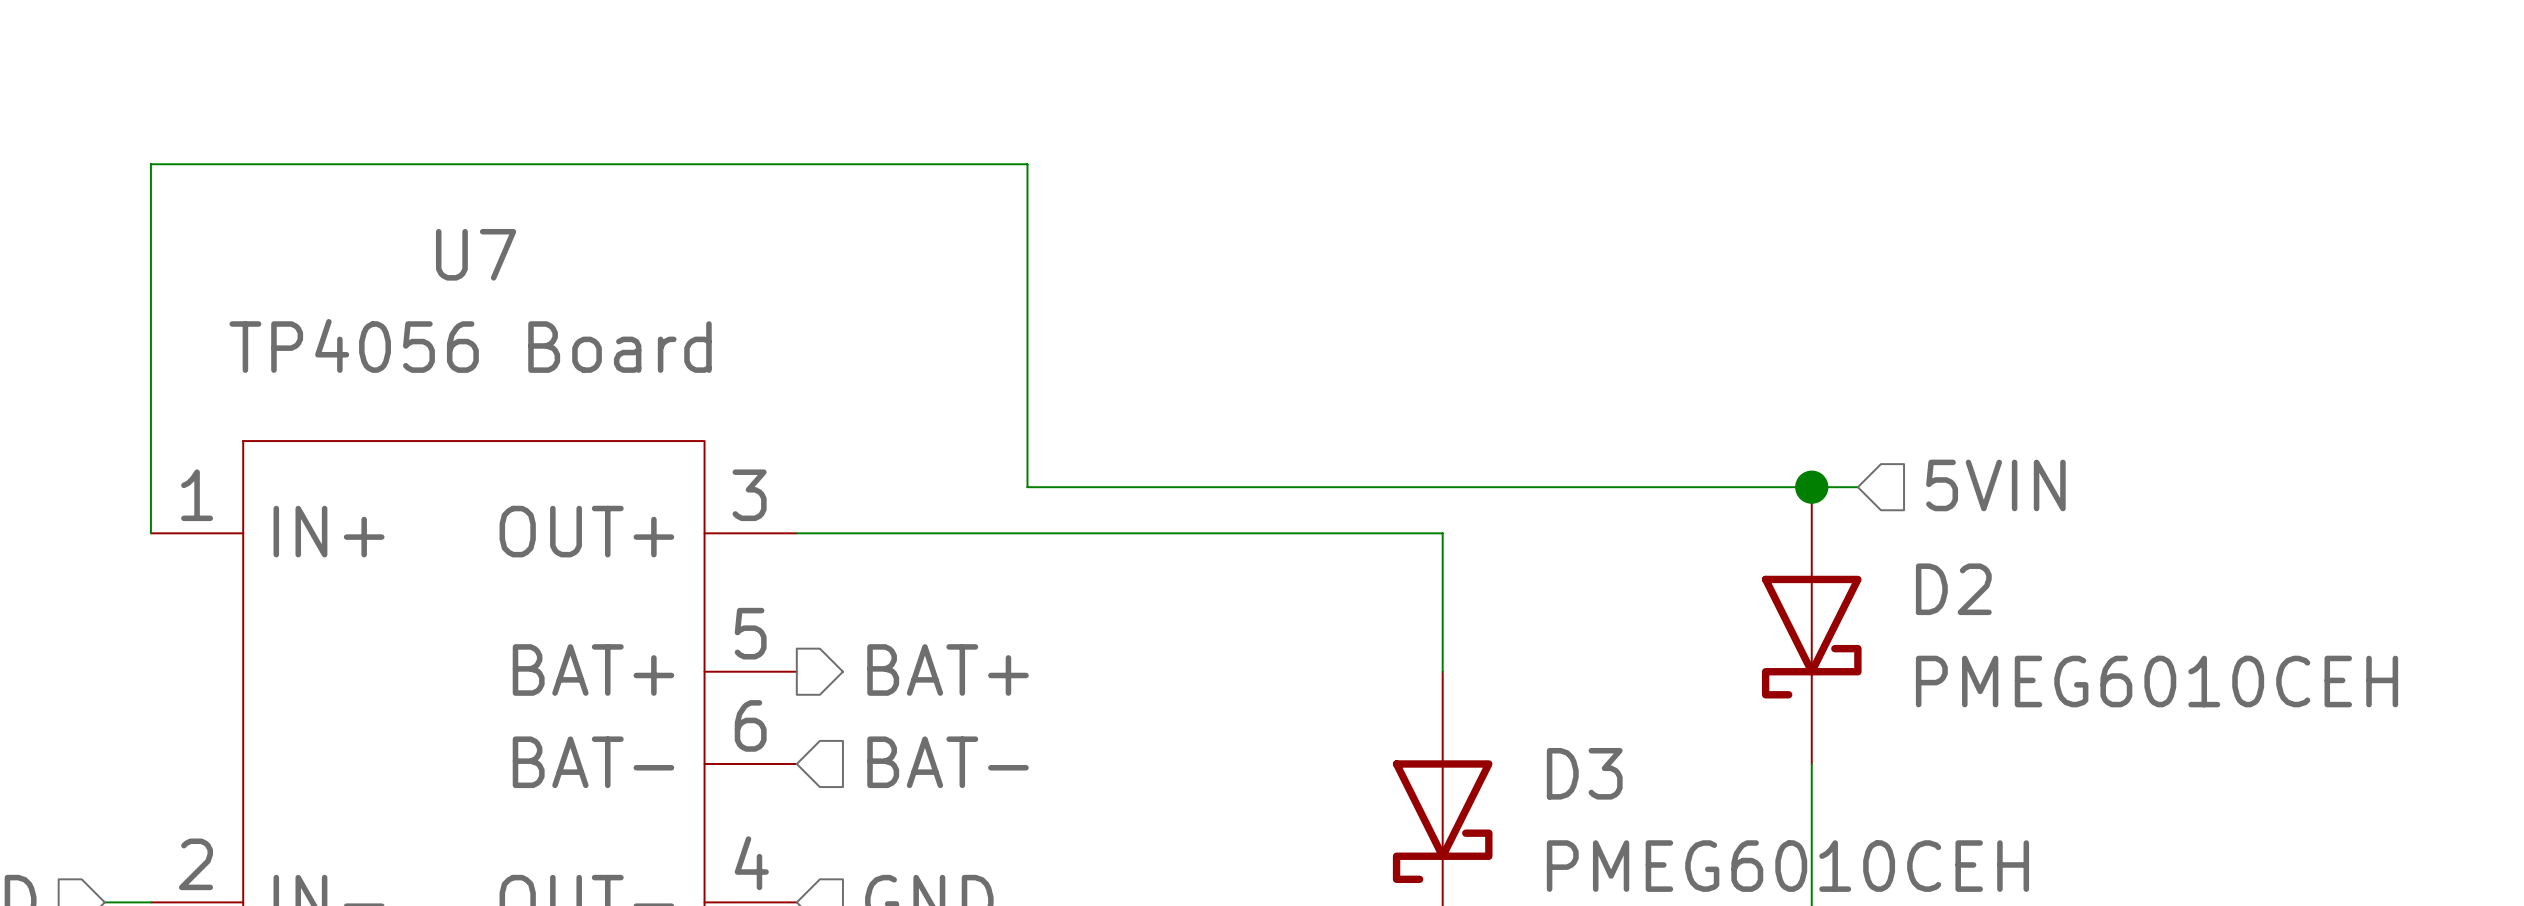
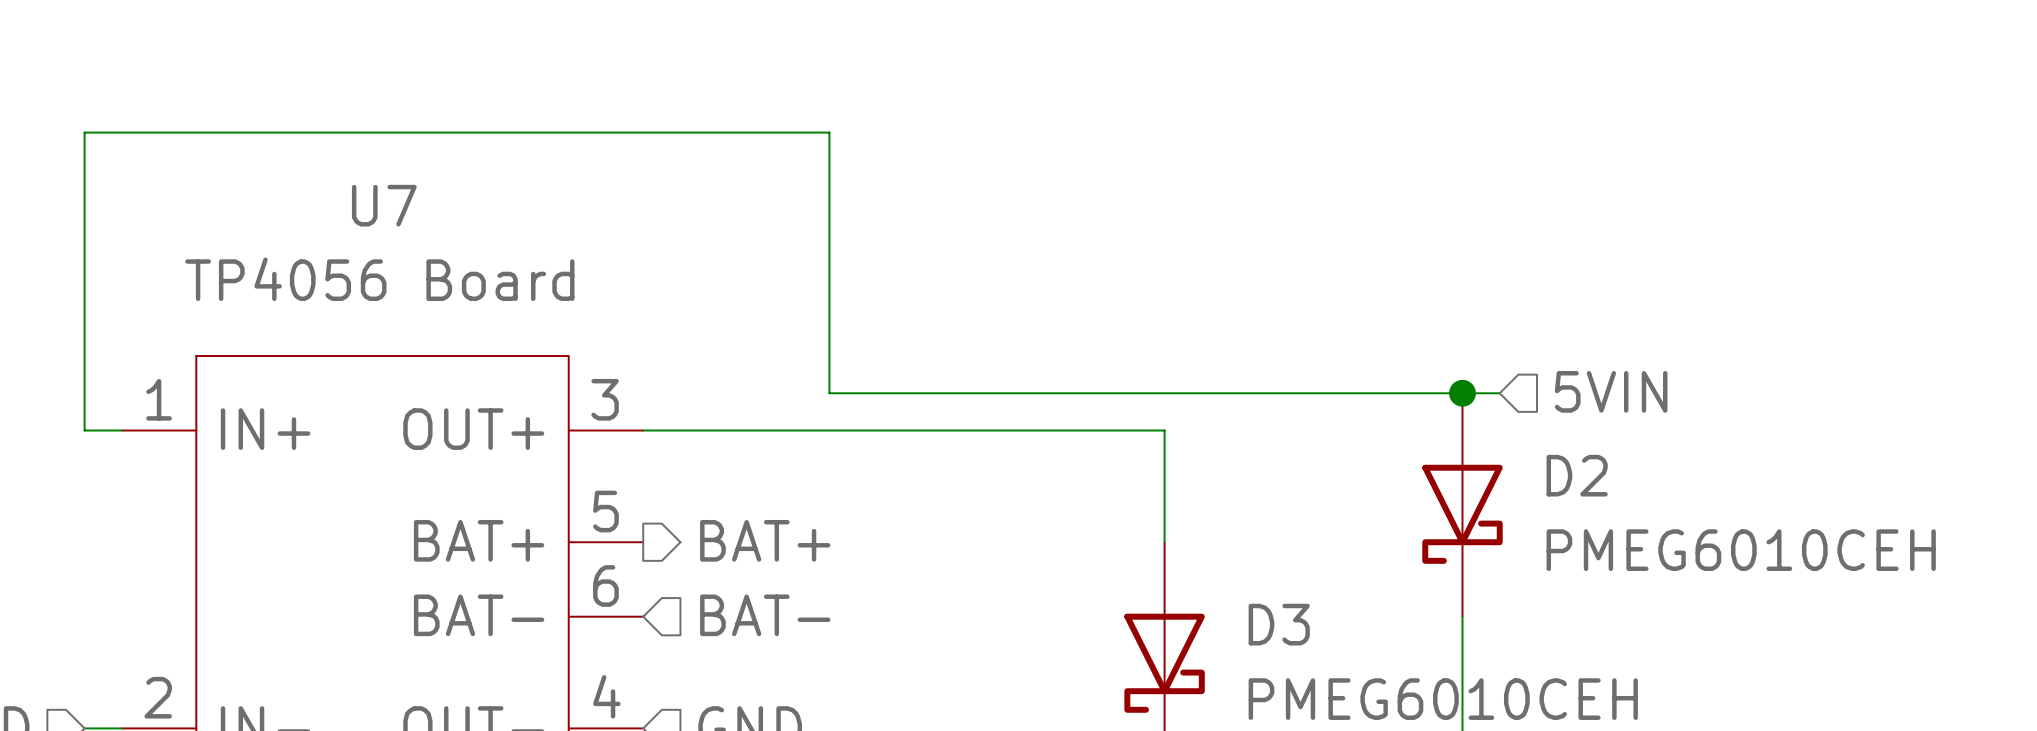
wire: (150, 164) (150, 533) -> (121, 132) (84, 132) (84, 430) (121, 430)

